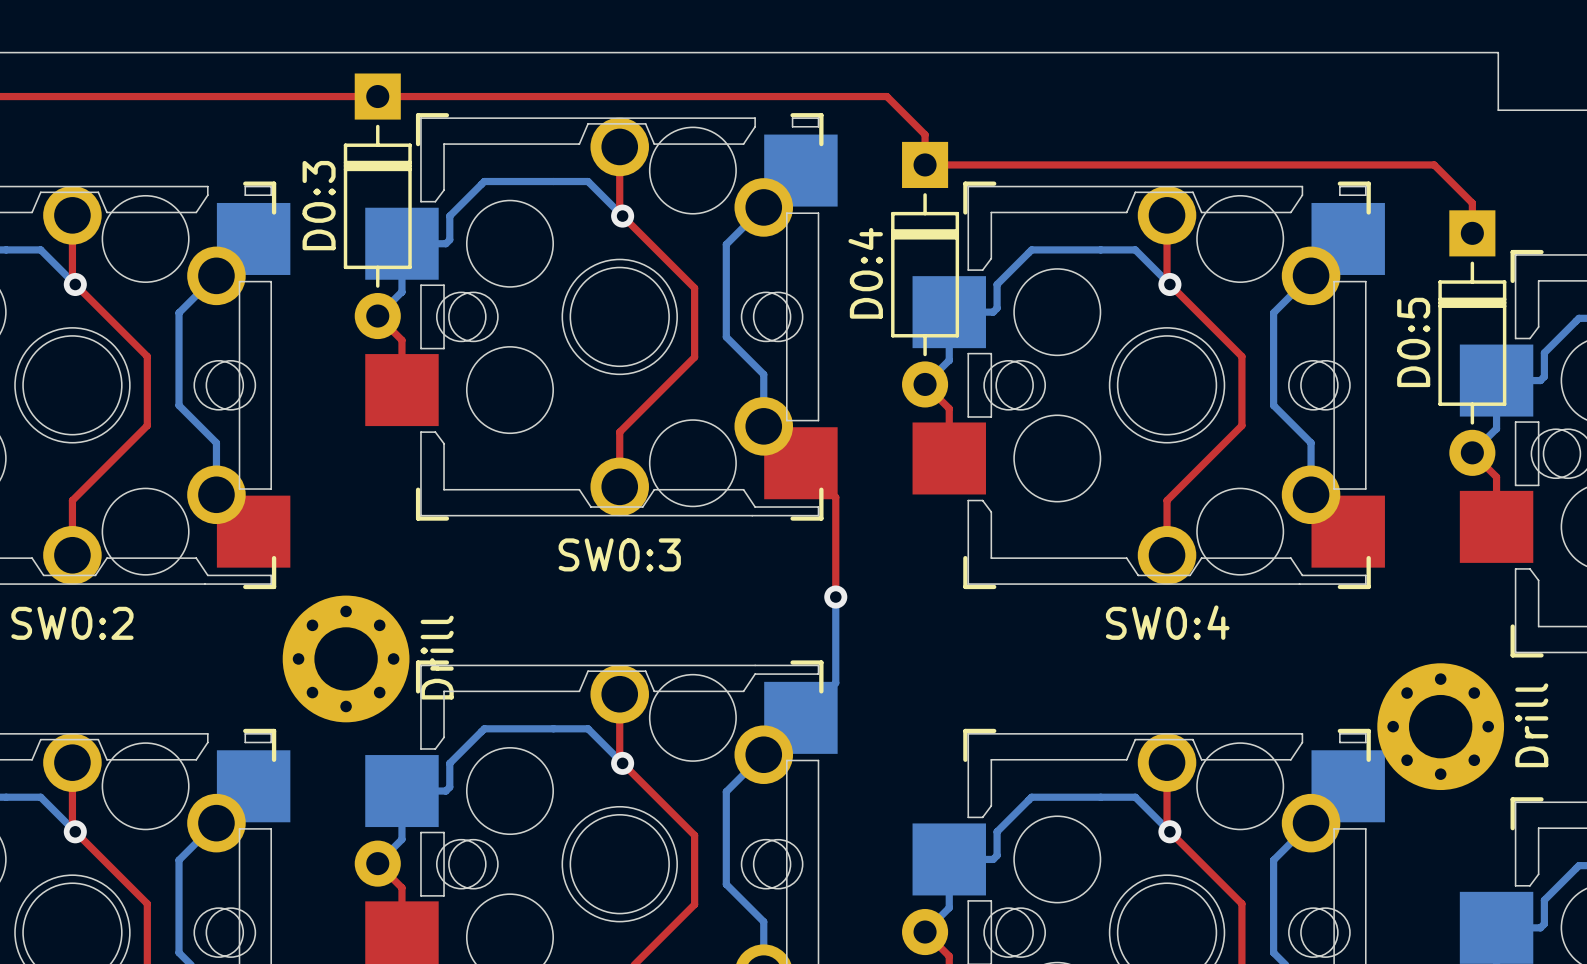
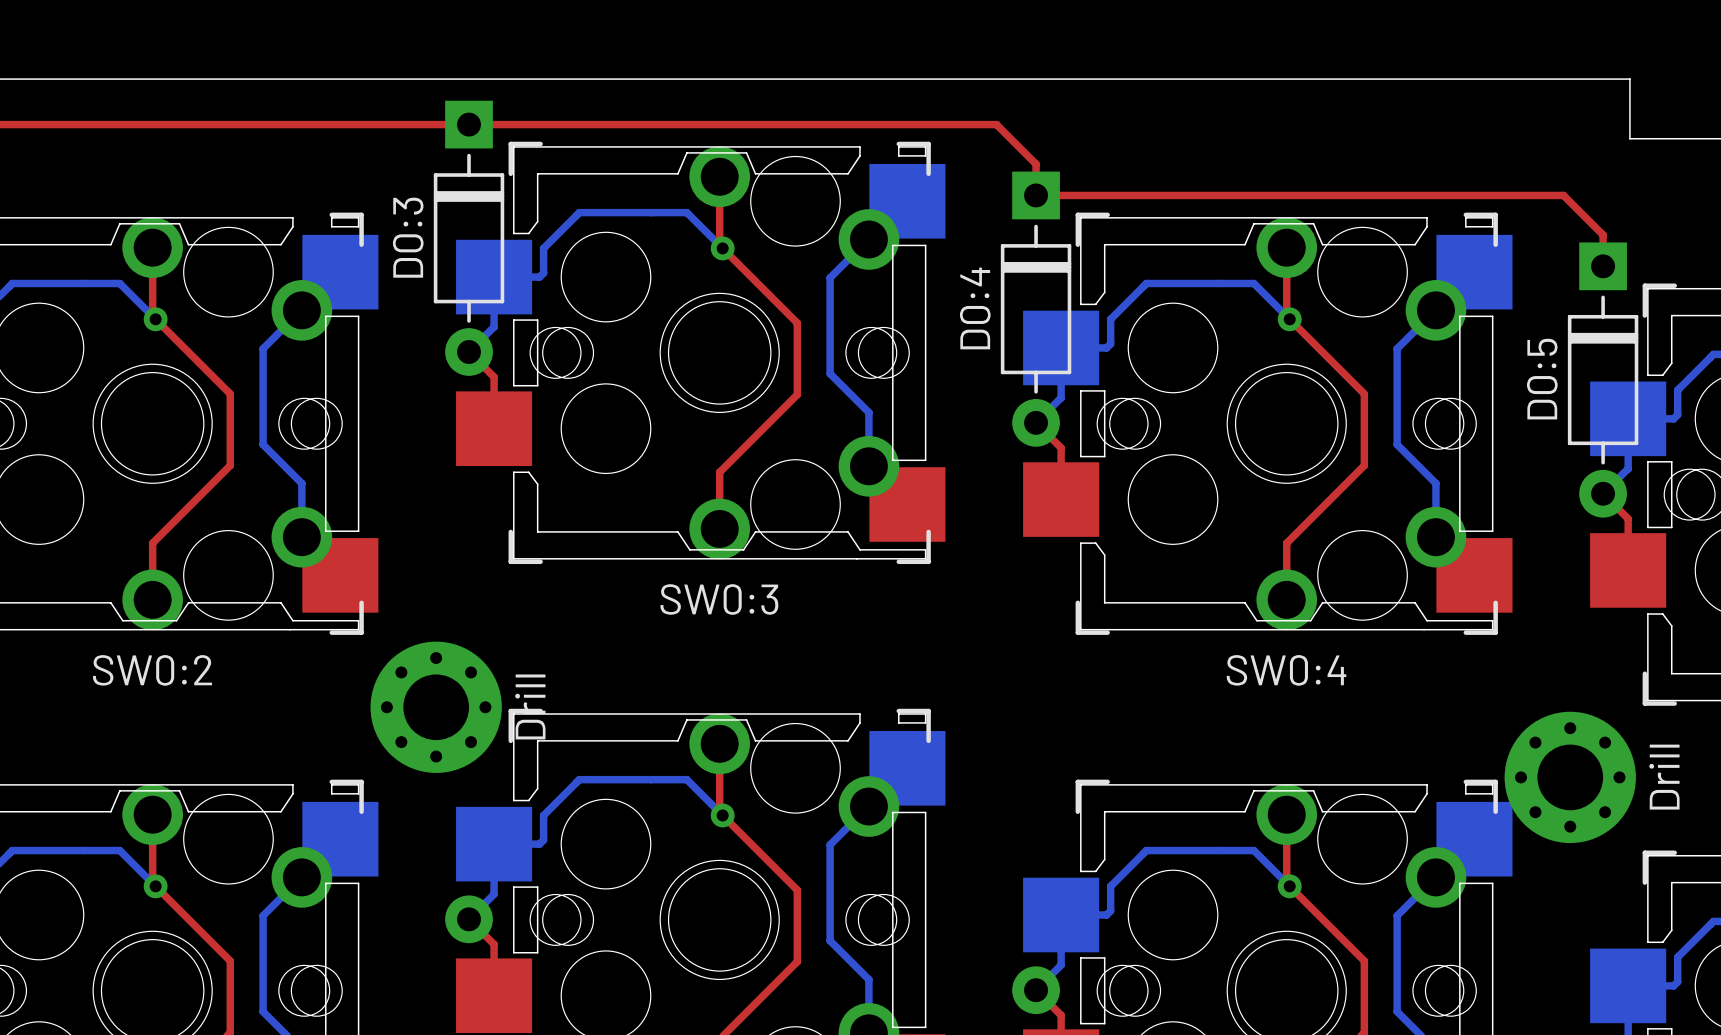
top track: (800, 463) (835, 497) (835, 597) -> none
bottom track: (835, 597) (835, 683) (800, 717) -> none
via: (835, 597) -> none
board edge: (755, 665) (792, 665) -> (859, 714) (859, 722)
board edge: (755, 674) (792, 674) -> (898, 714) (898, 722)

